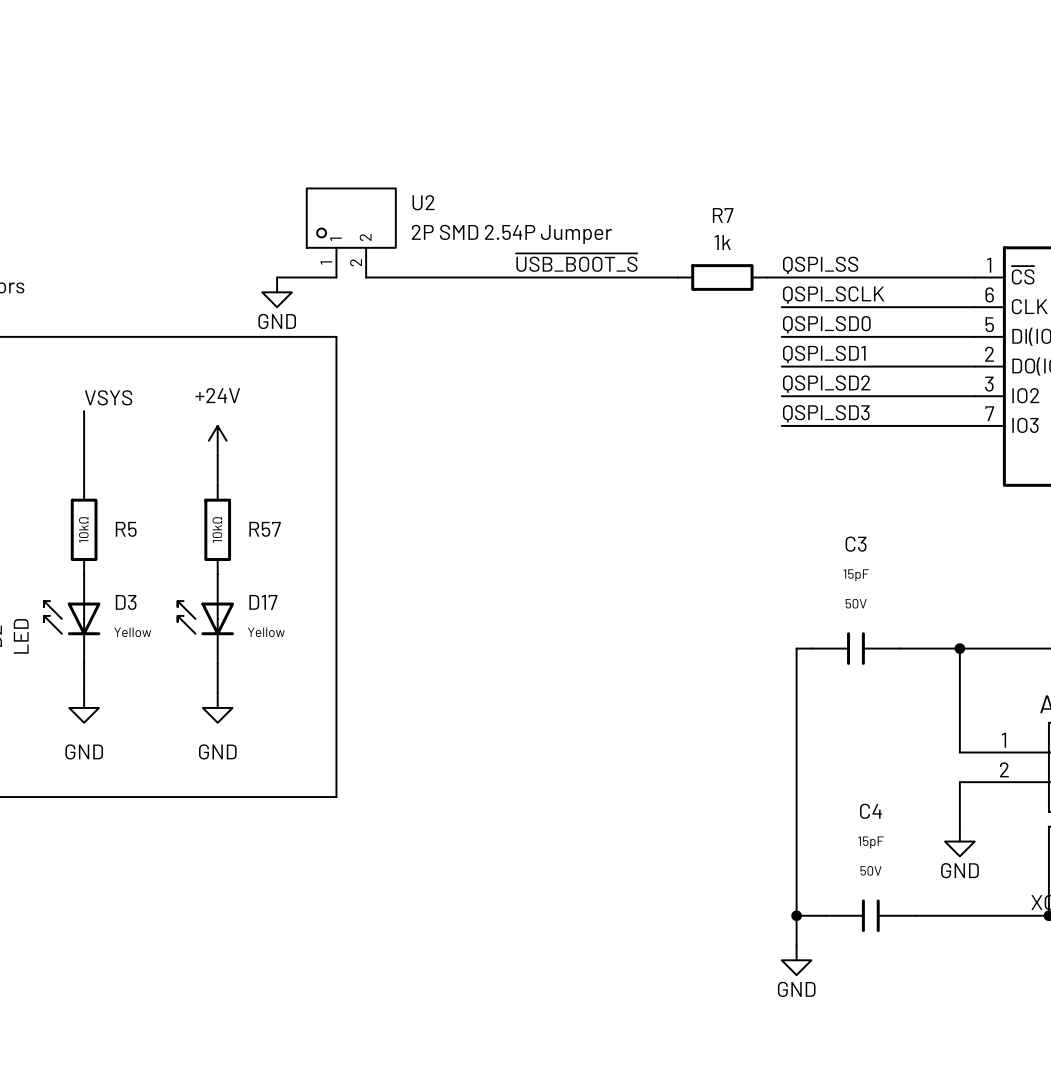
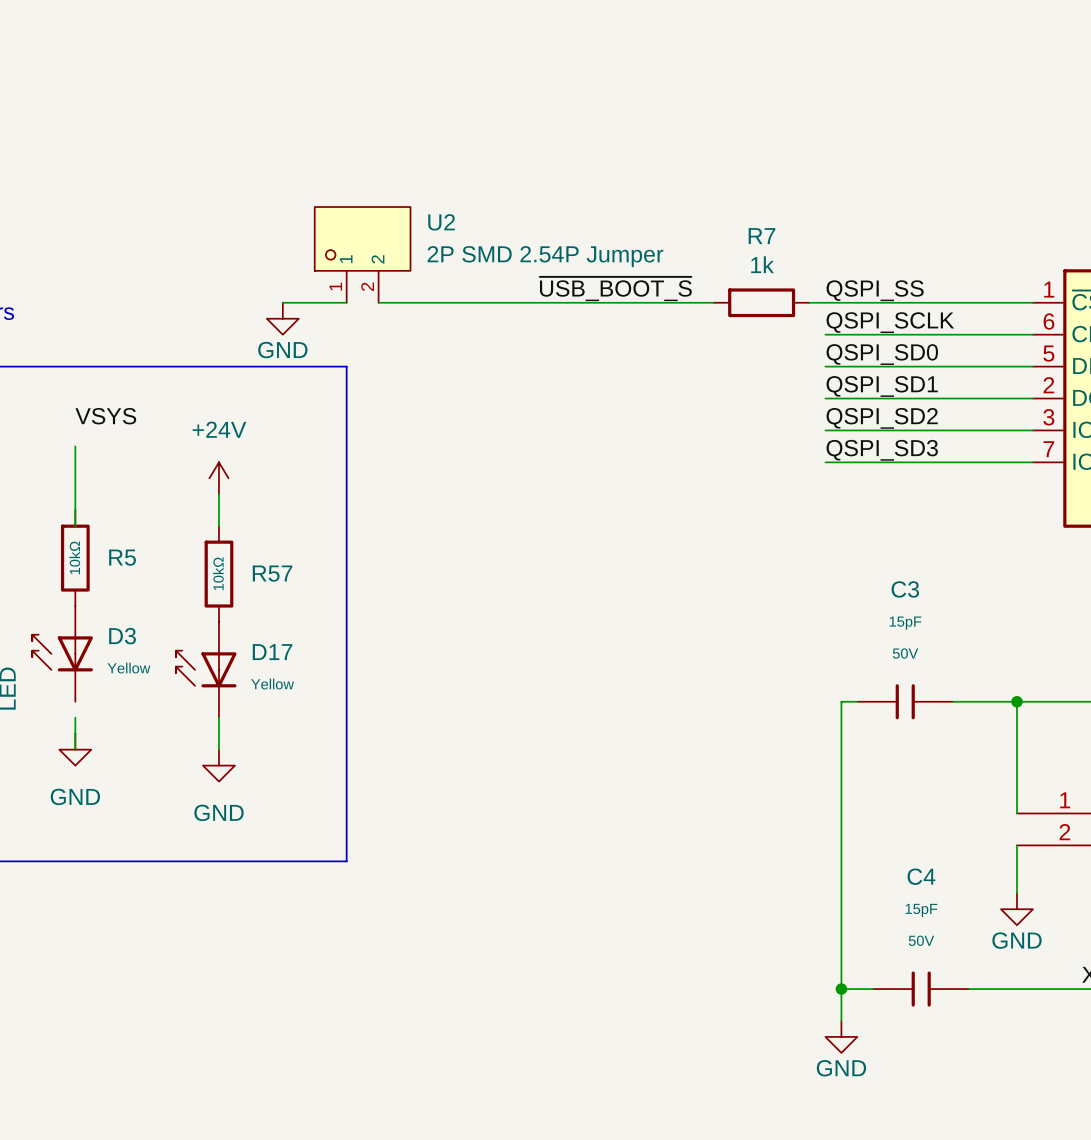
label position: VSYS (108, 397) -> VSYS (105, 416)
R5 position: (84, 529) -> (75, 558)
D3 position: (71, 618) -> (62, 653)
power symbol position: GND (84, 707) -> GND (75, 749)

